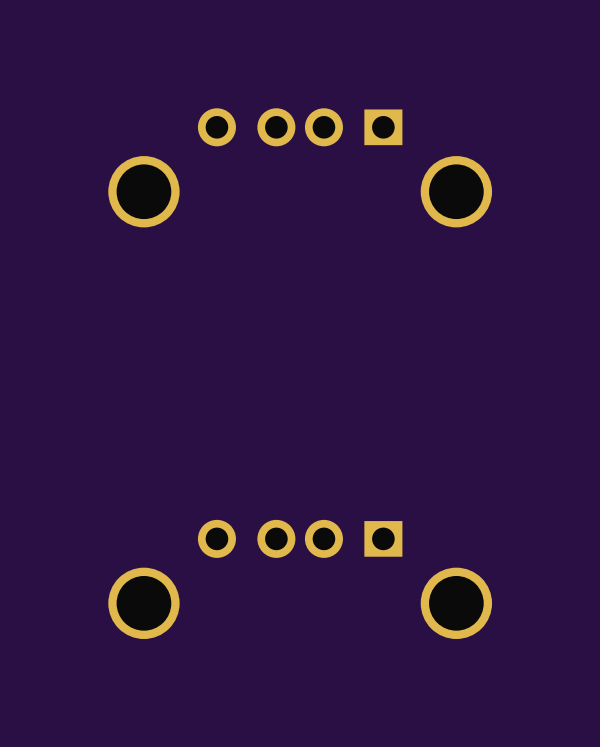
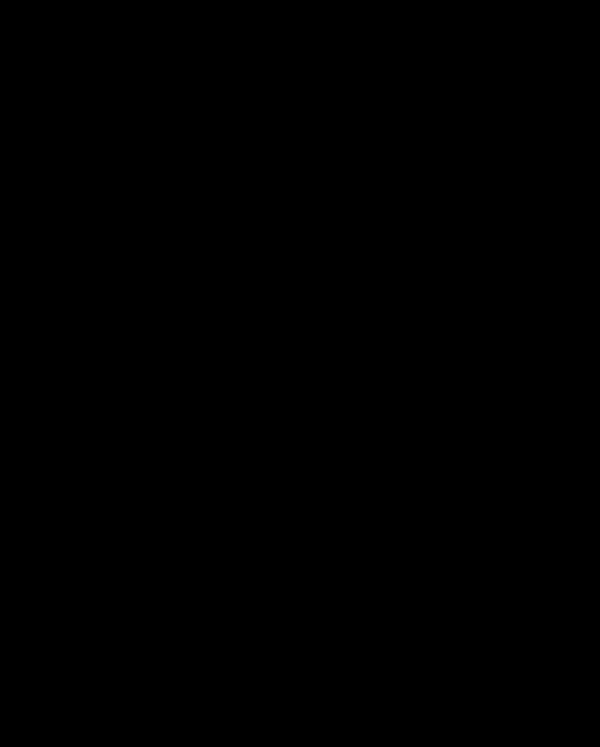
part: (300, 167) -> none
part: (300, 579) -> none

